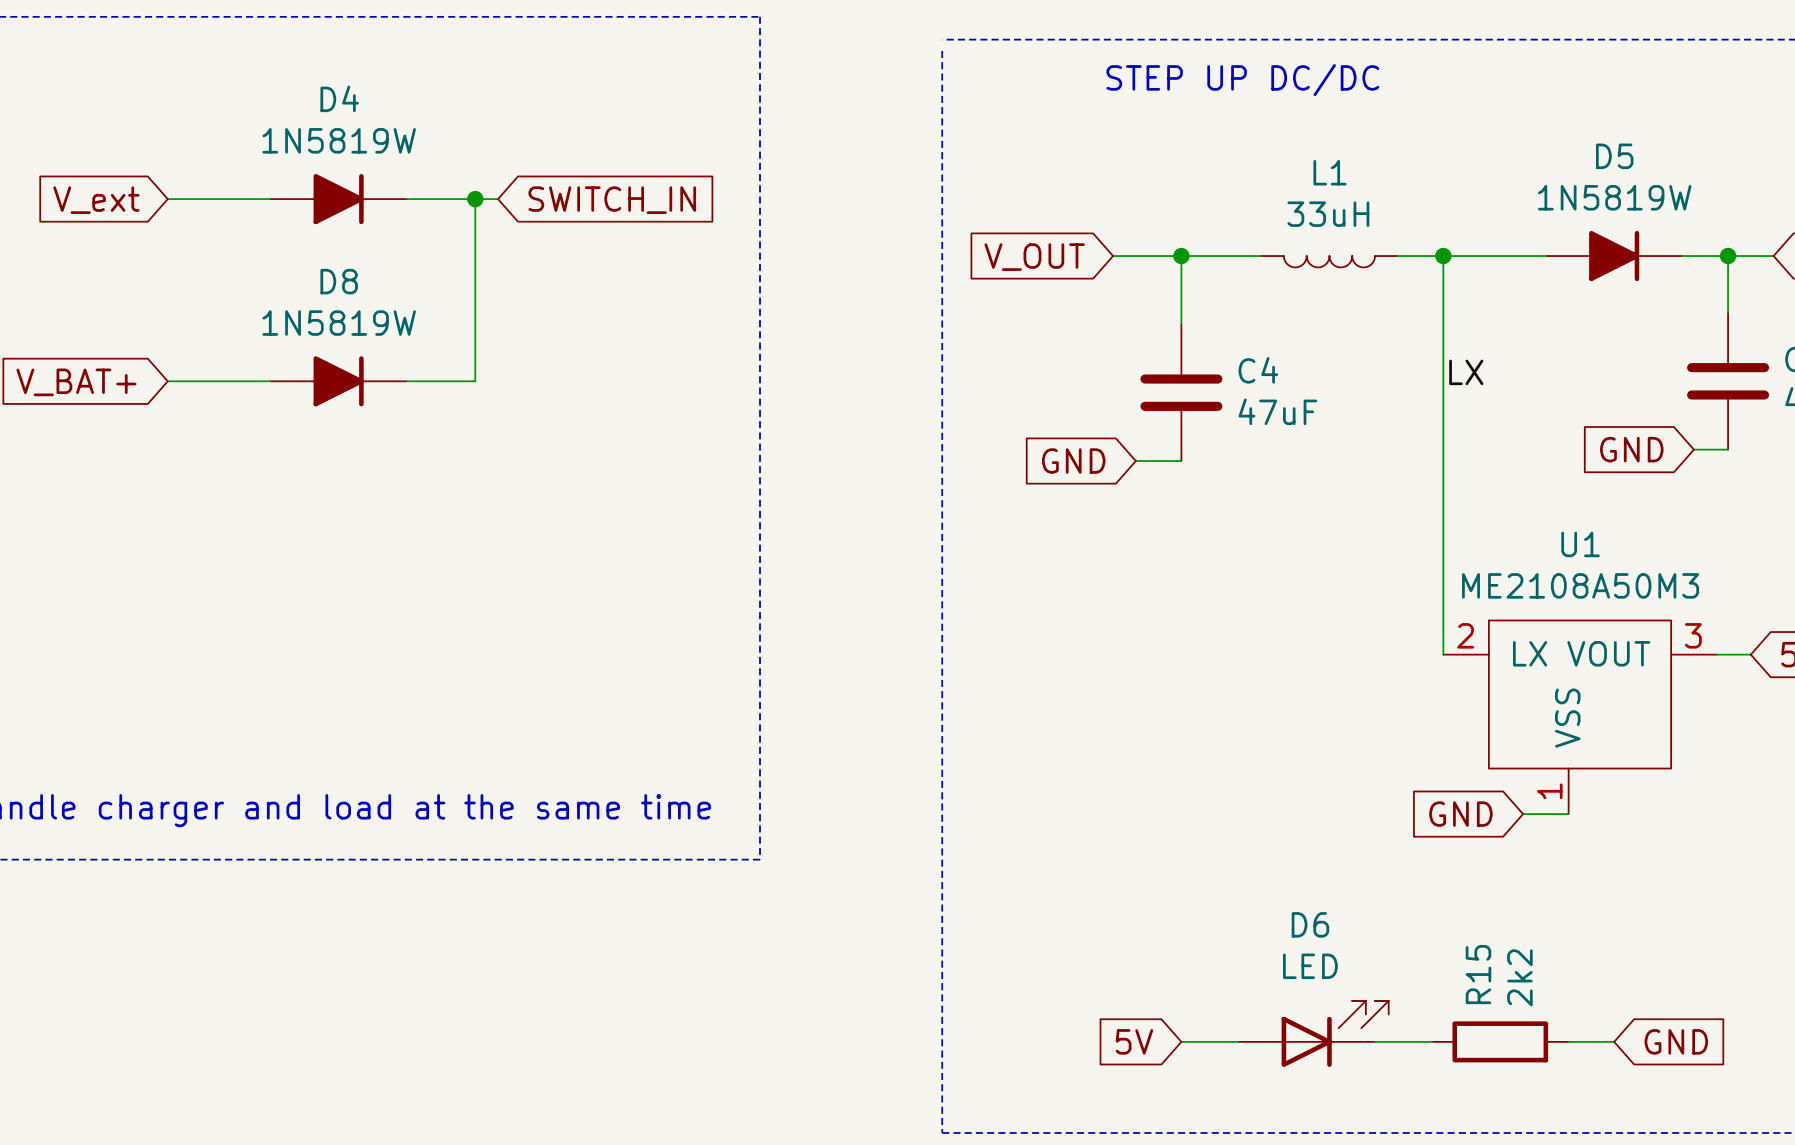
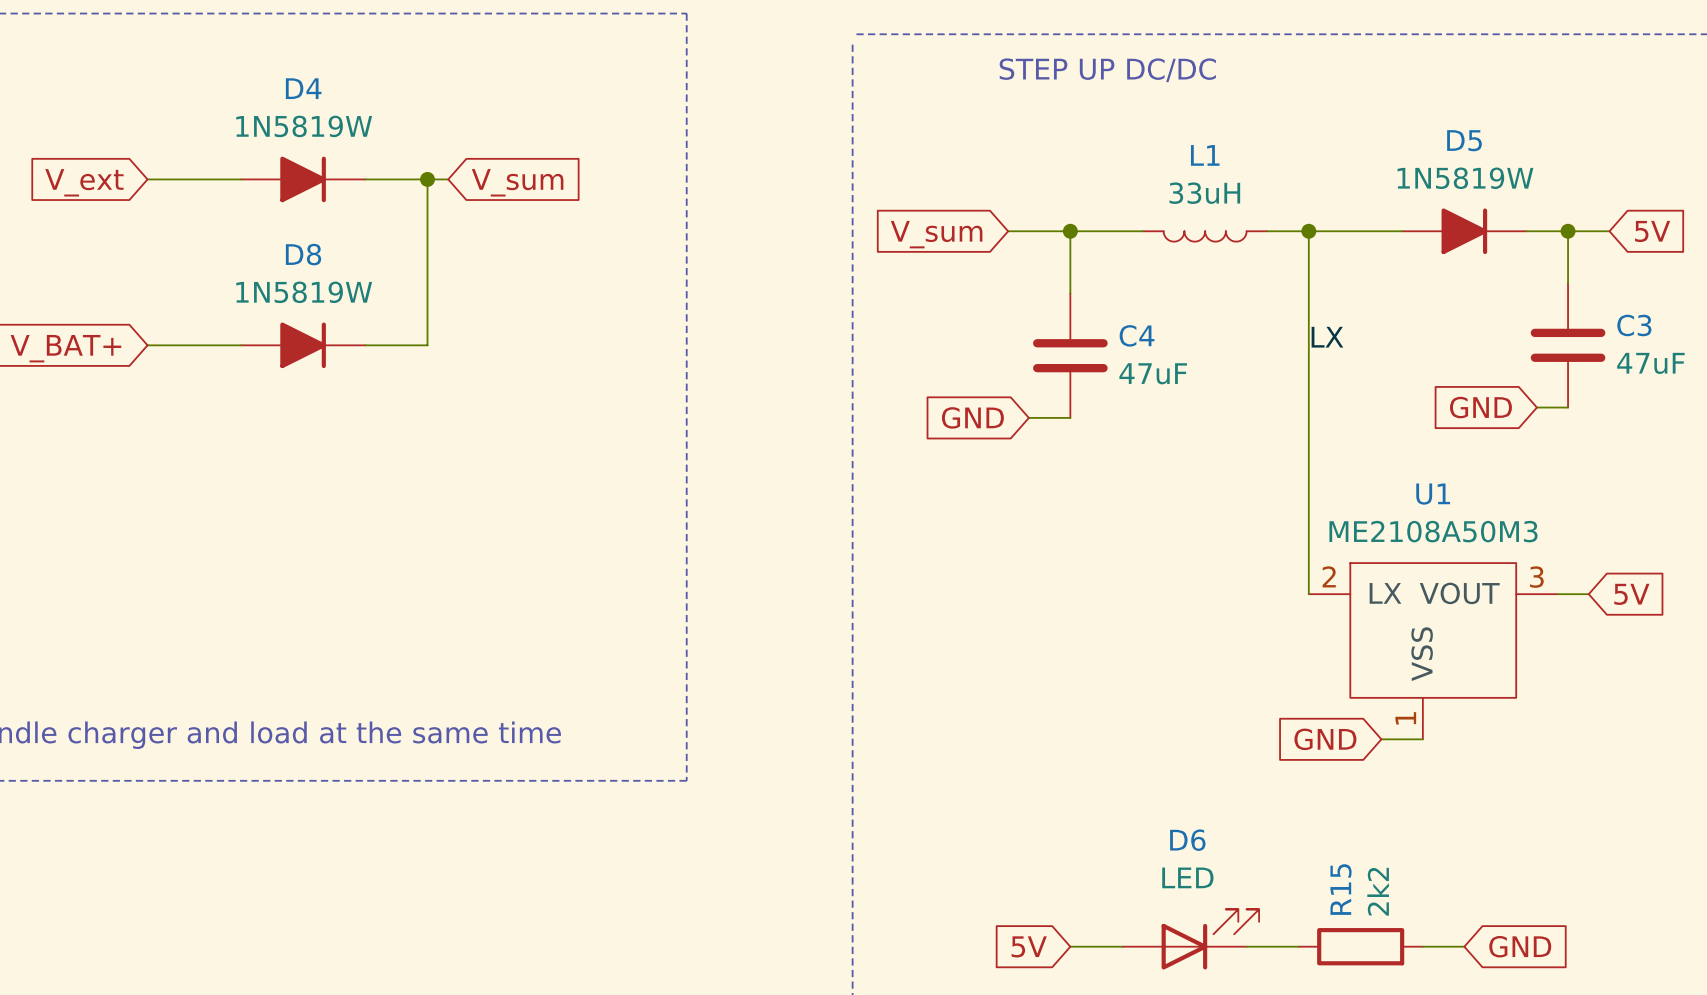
global label: SWITCH_IN (612, 200) -> V_sum (517, 182)
global label: V_OUT (1034, 257) -> V_sum (936, 234)

